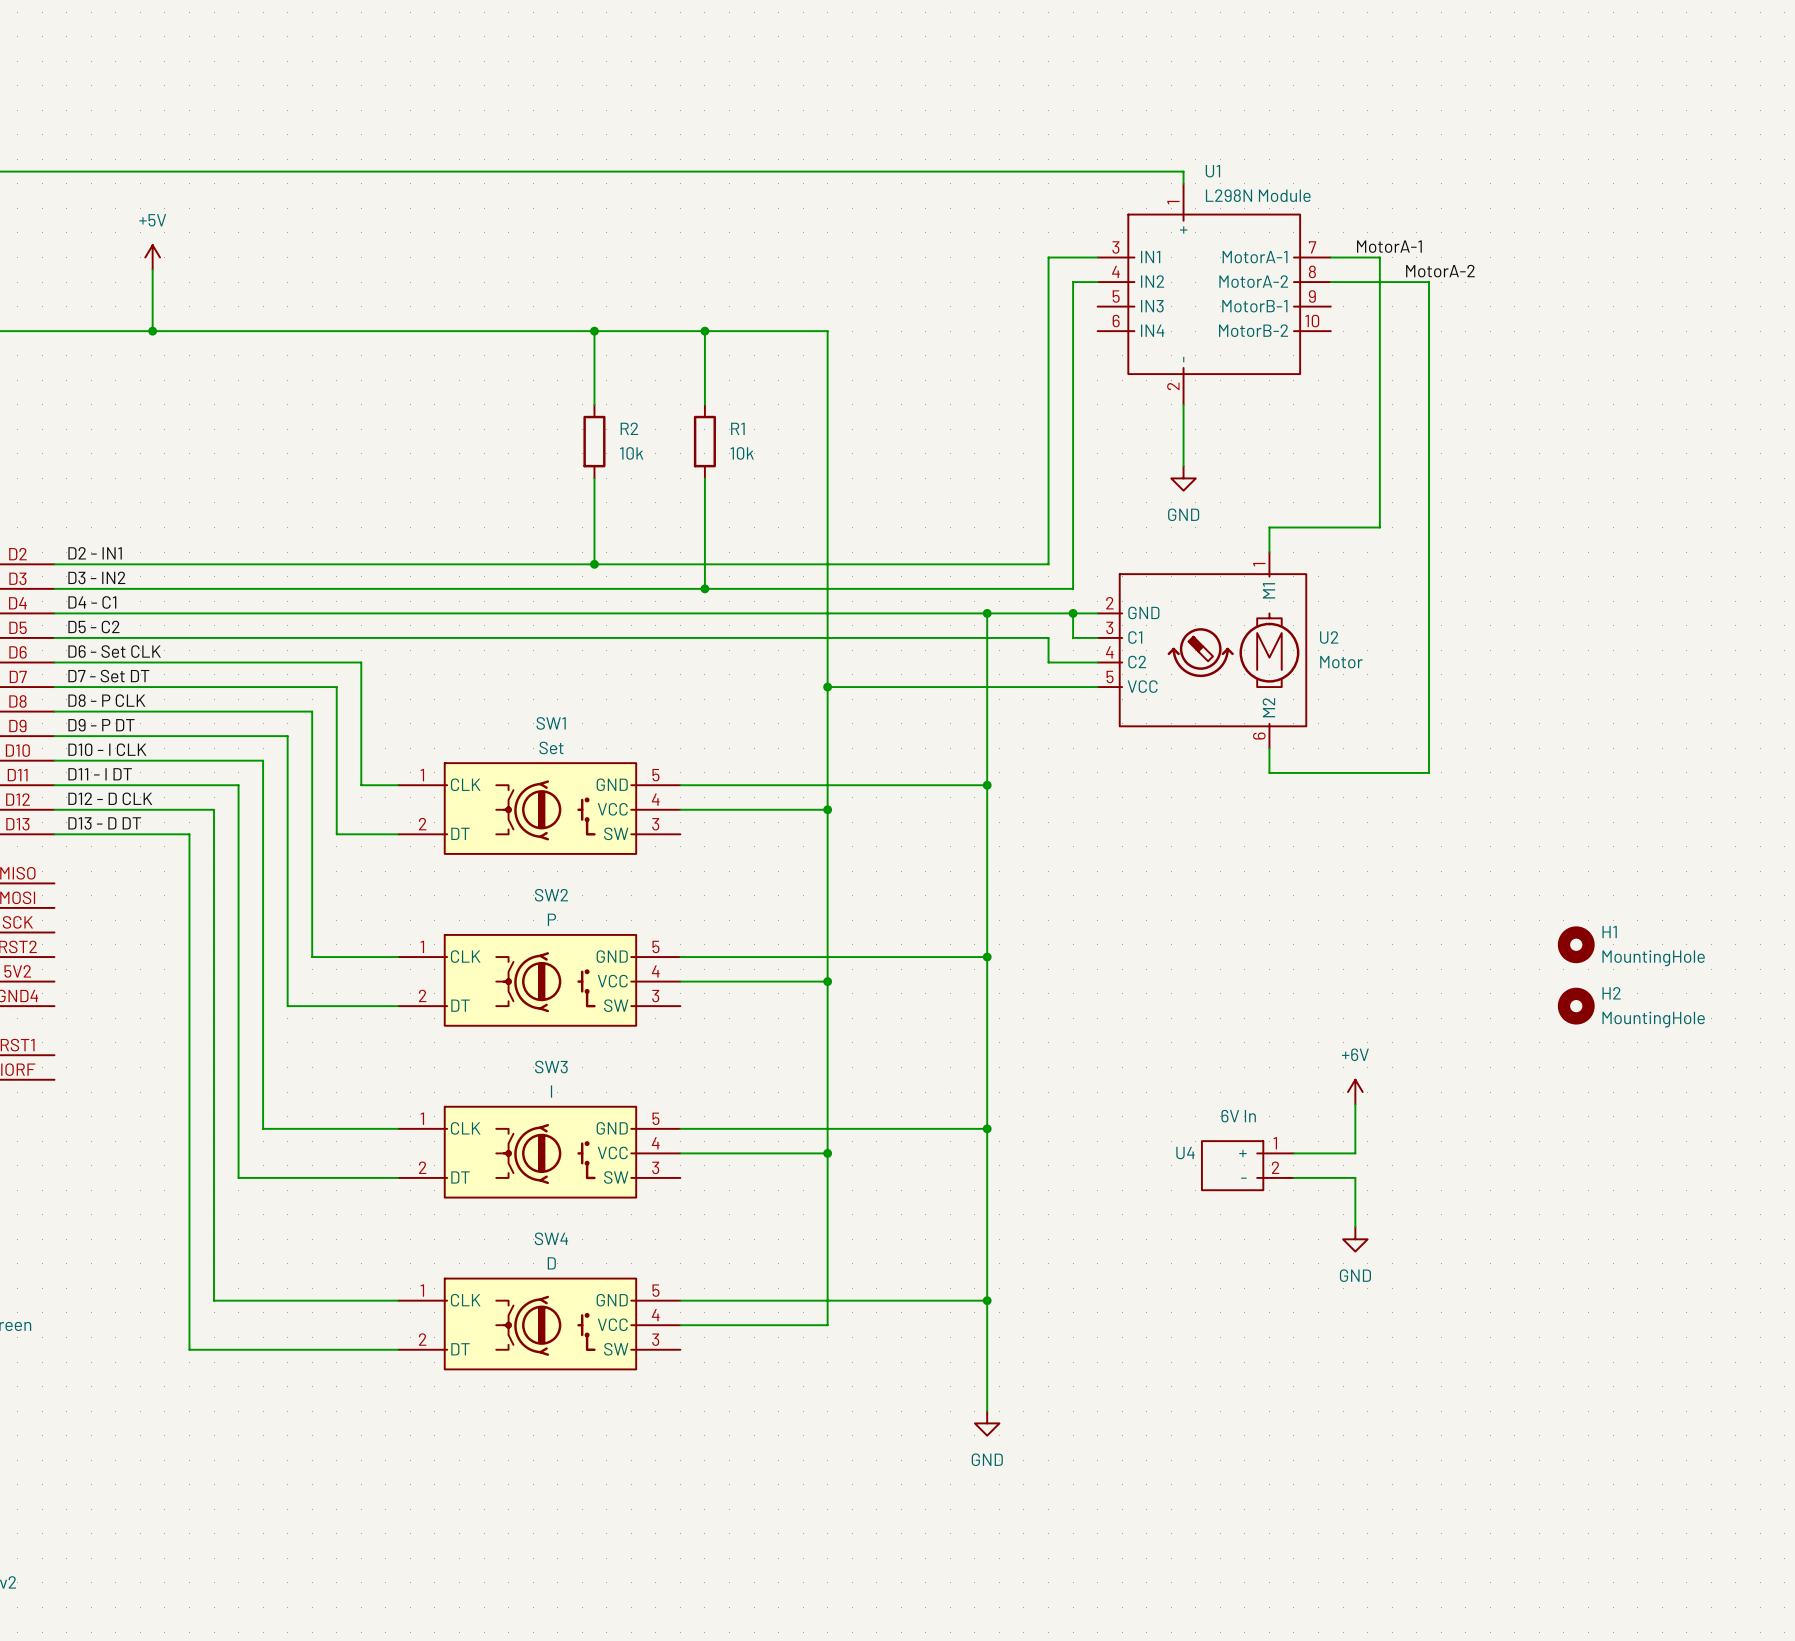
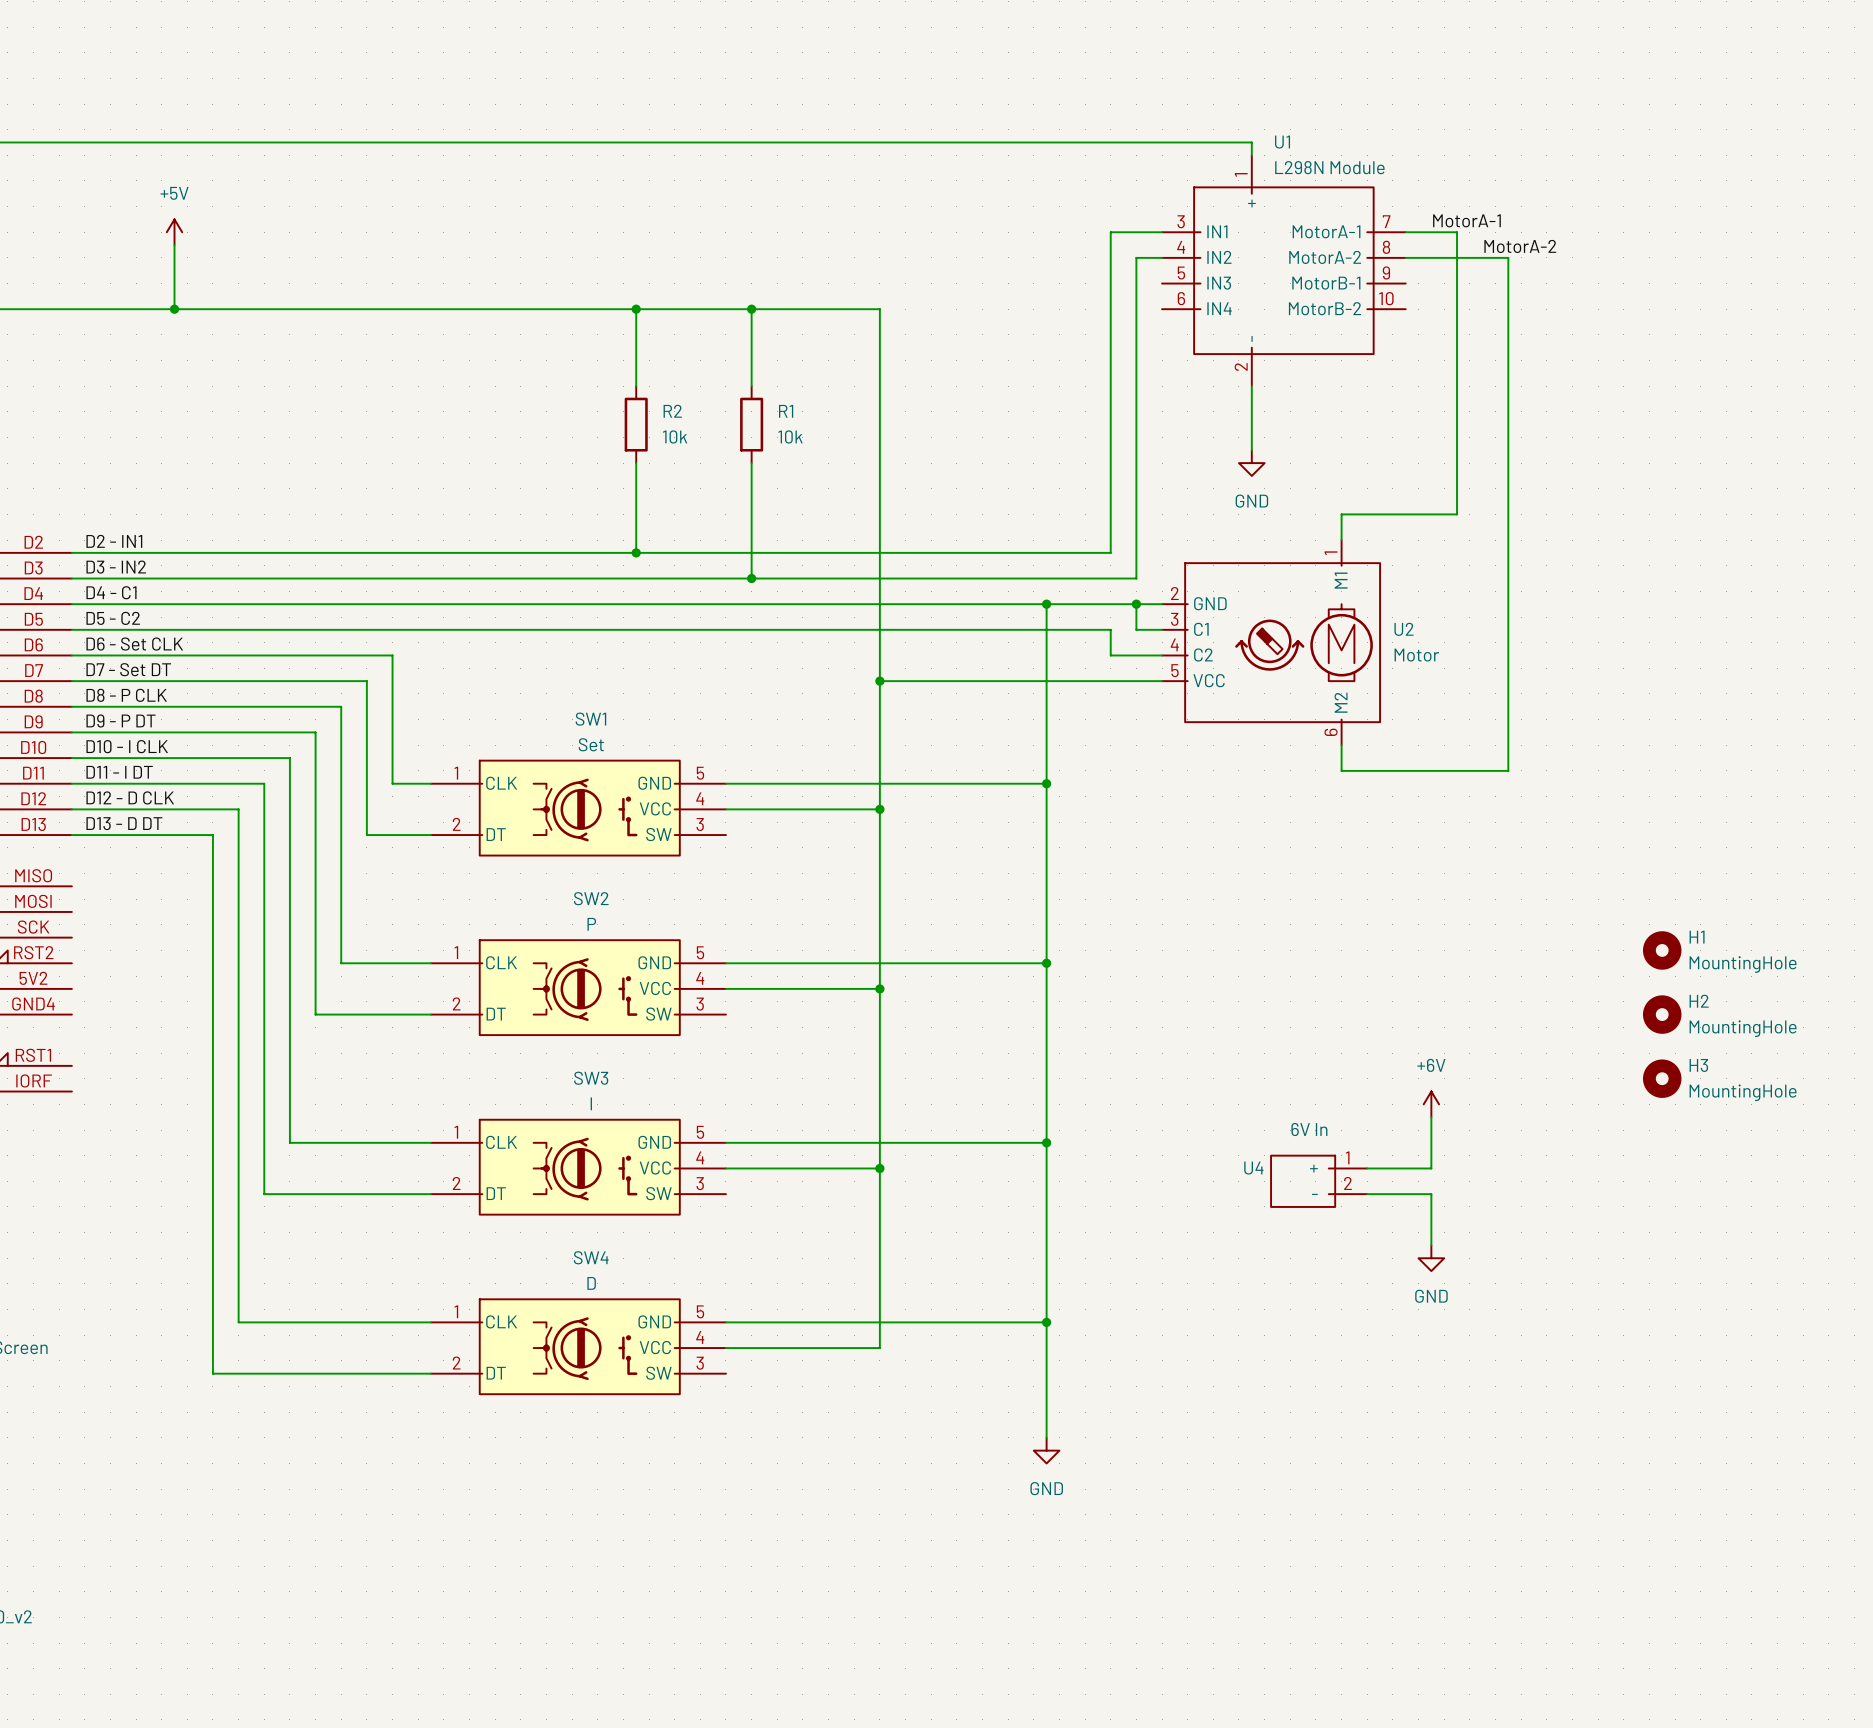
H3: none -> MountingHole (1662, 1078)

